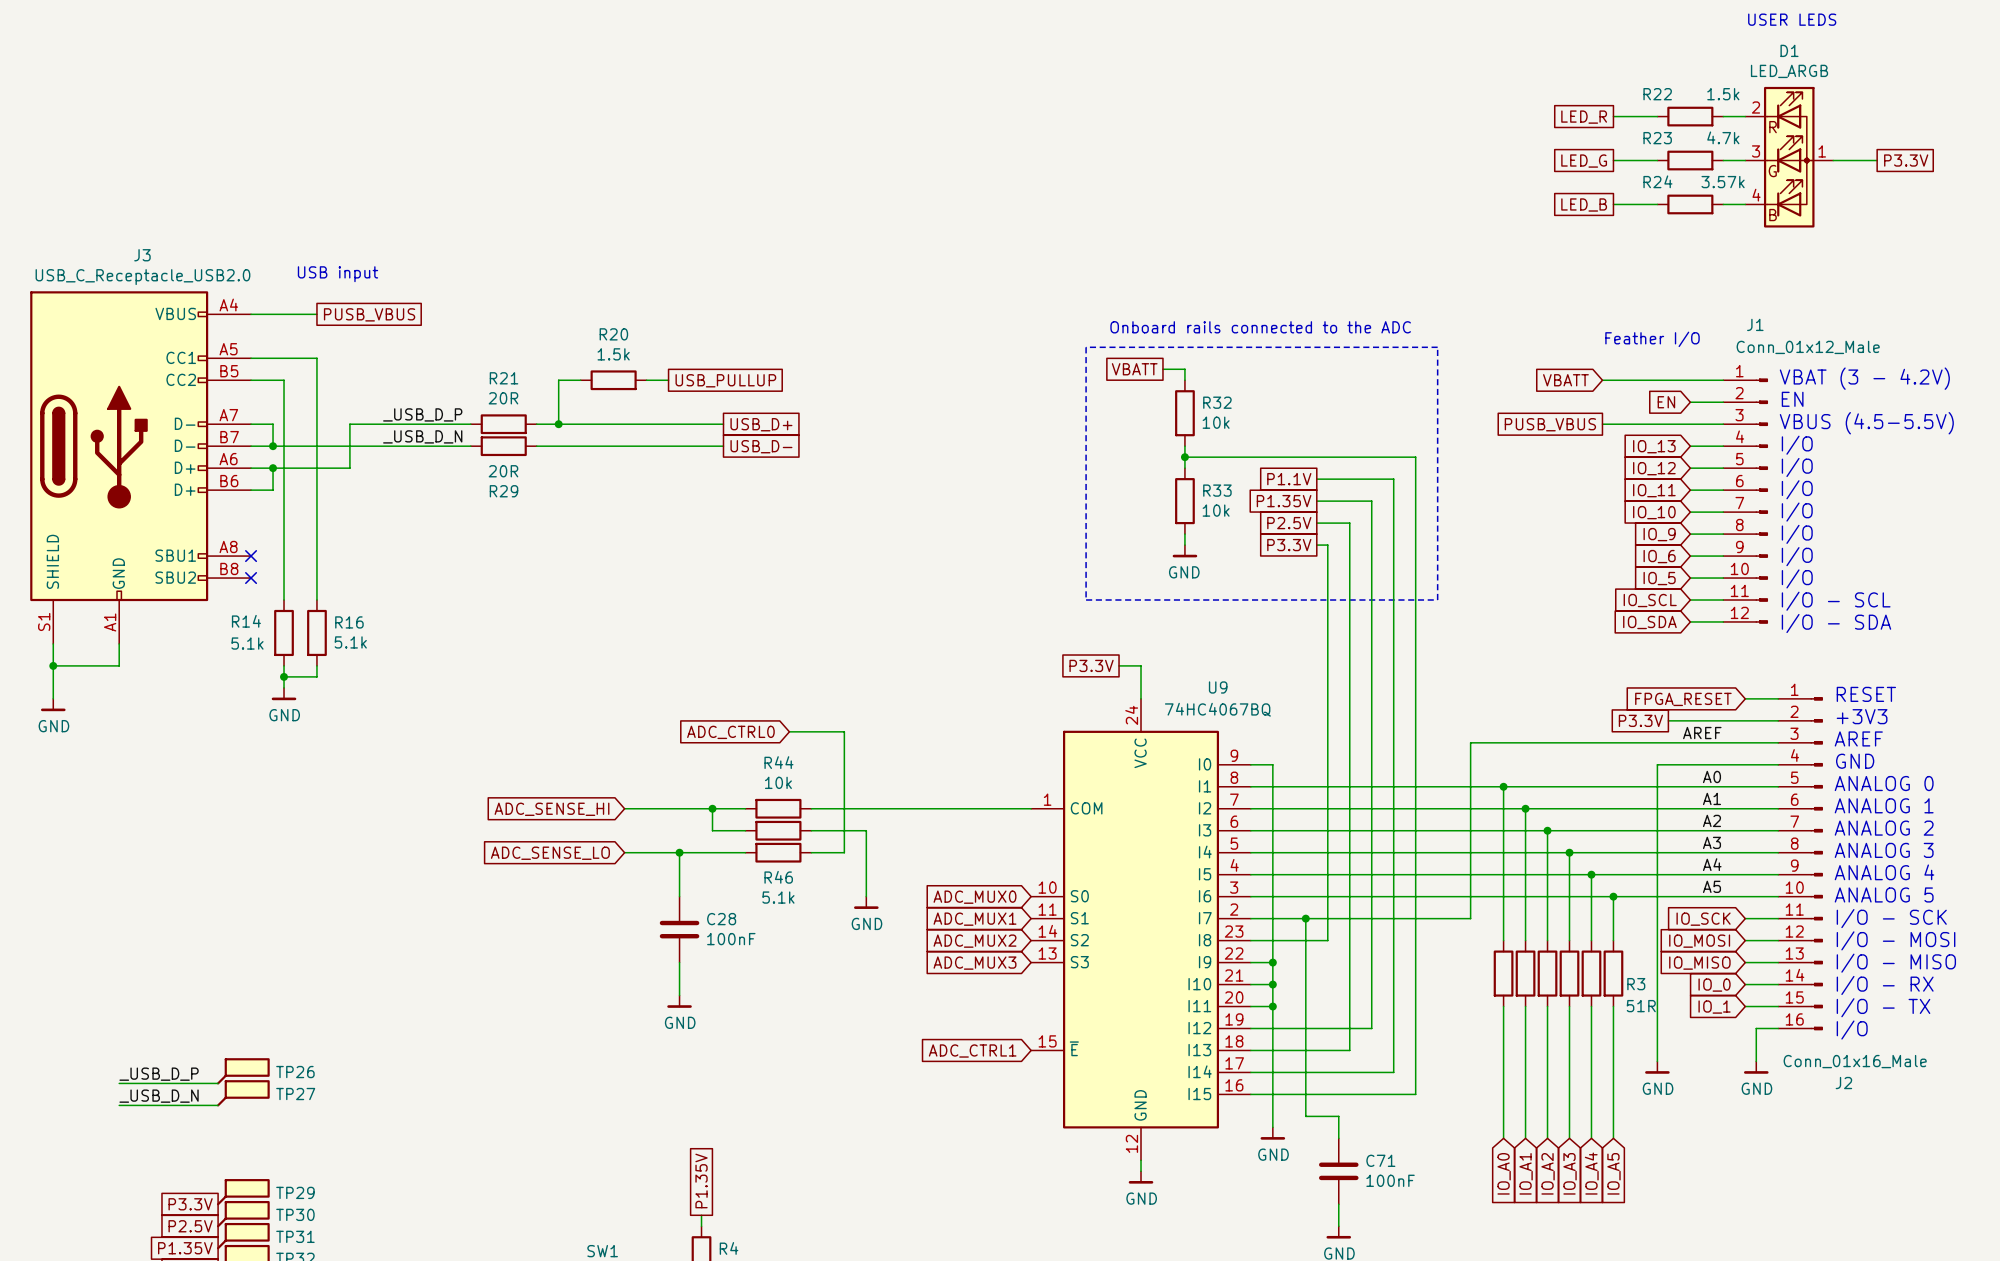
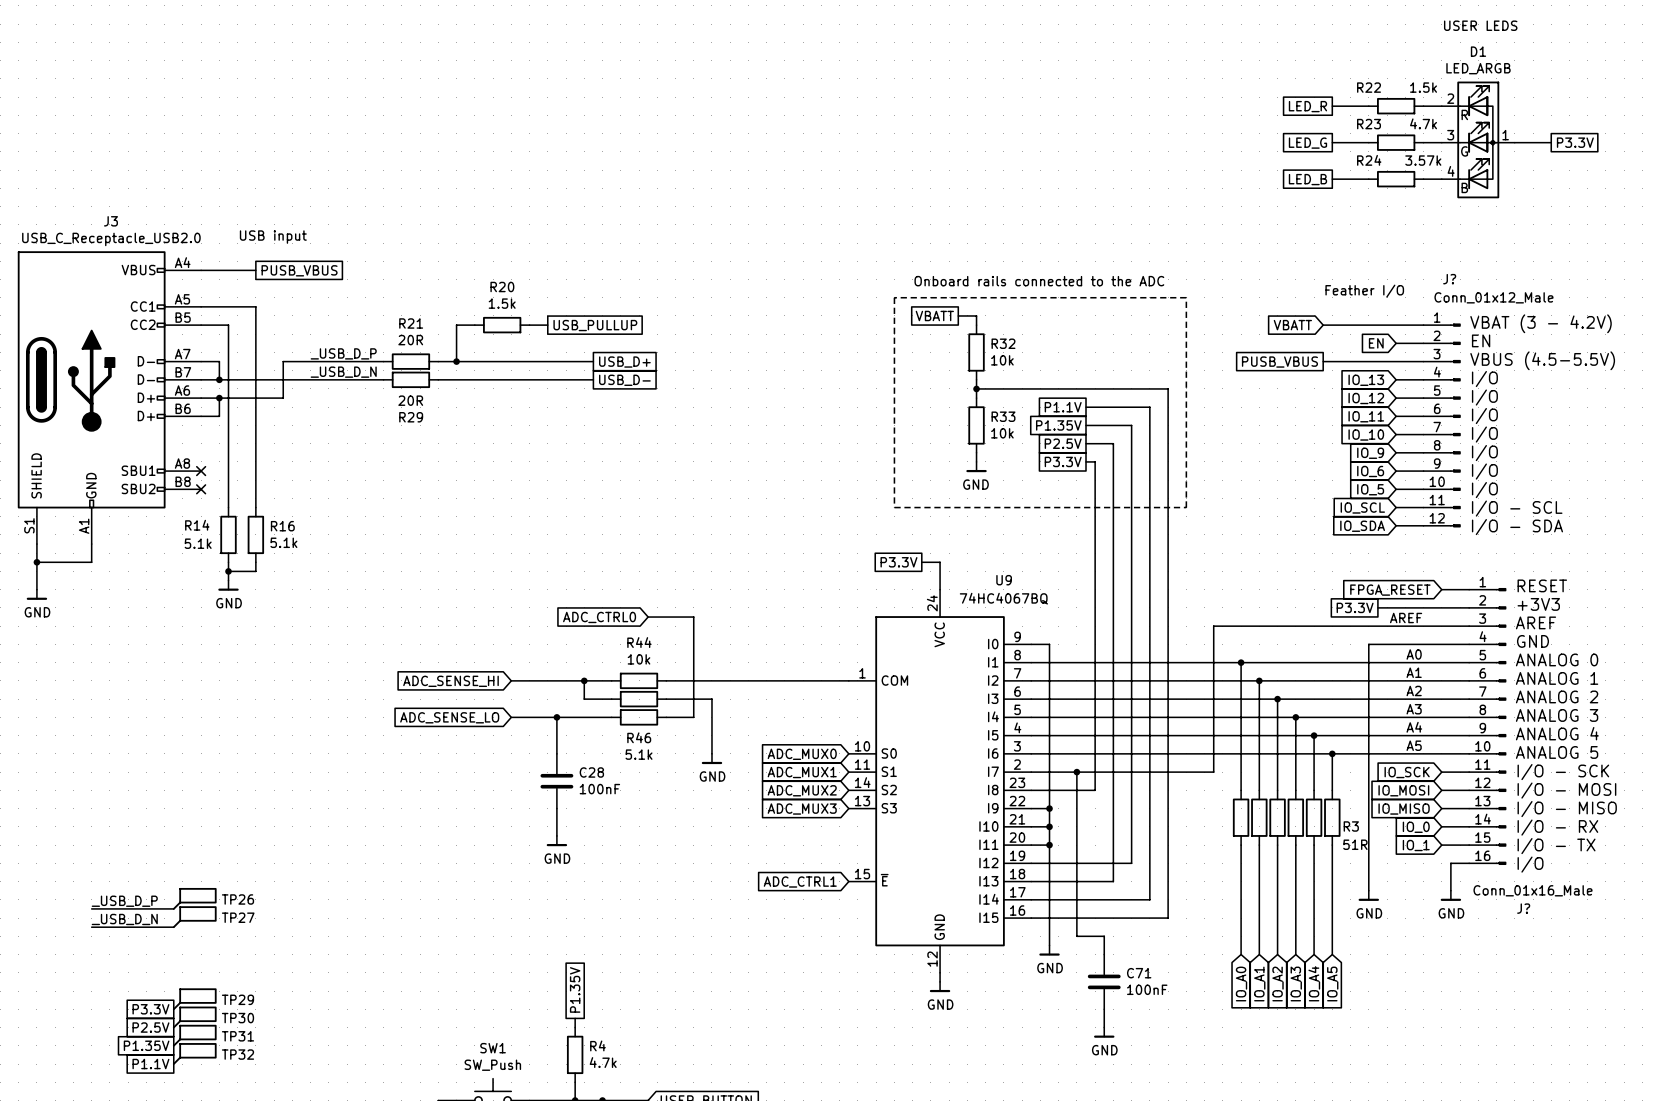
J1 name: J1 (1755, 324) -> J? (1449, 279)
J2 name: J2 (1843, 1083) -> J? (1523, 908)

